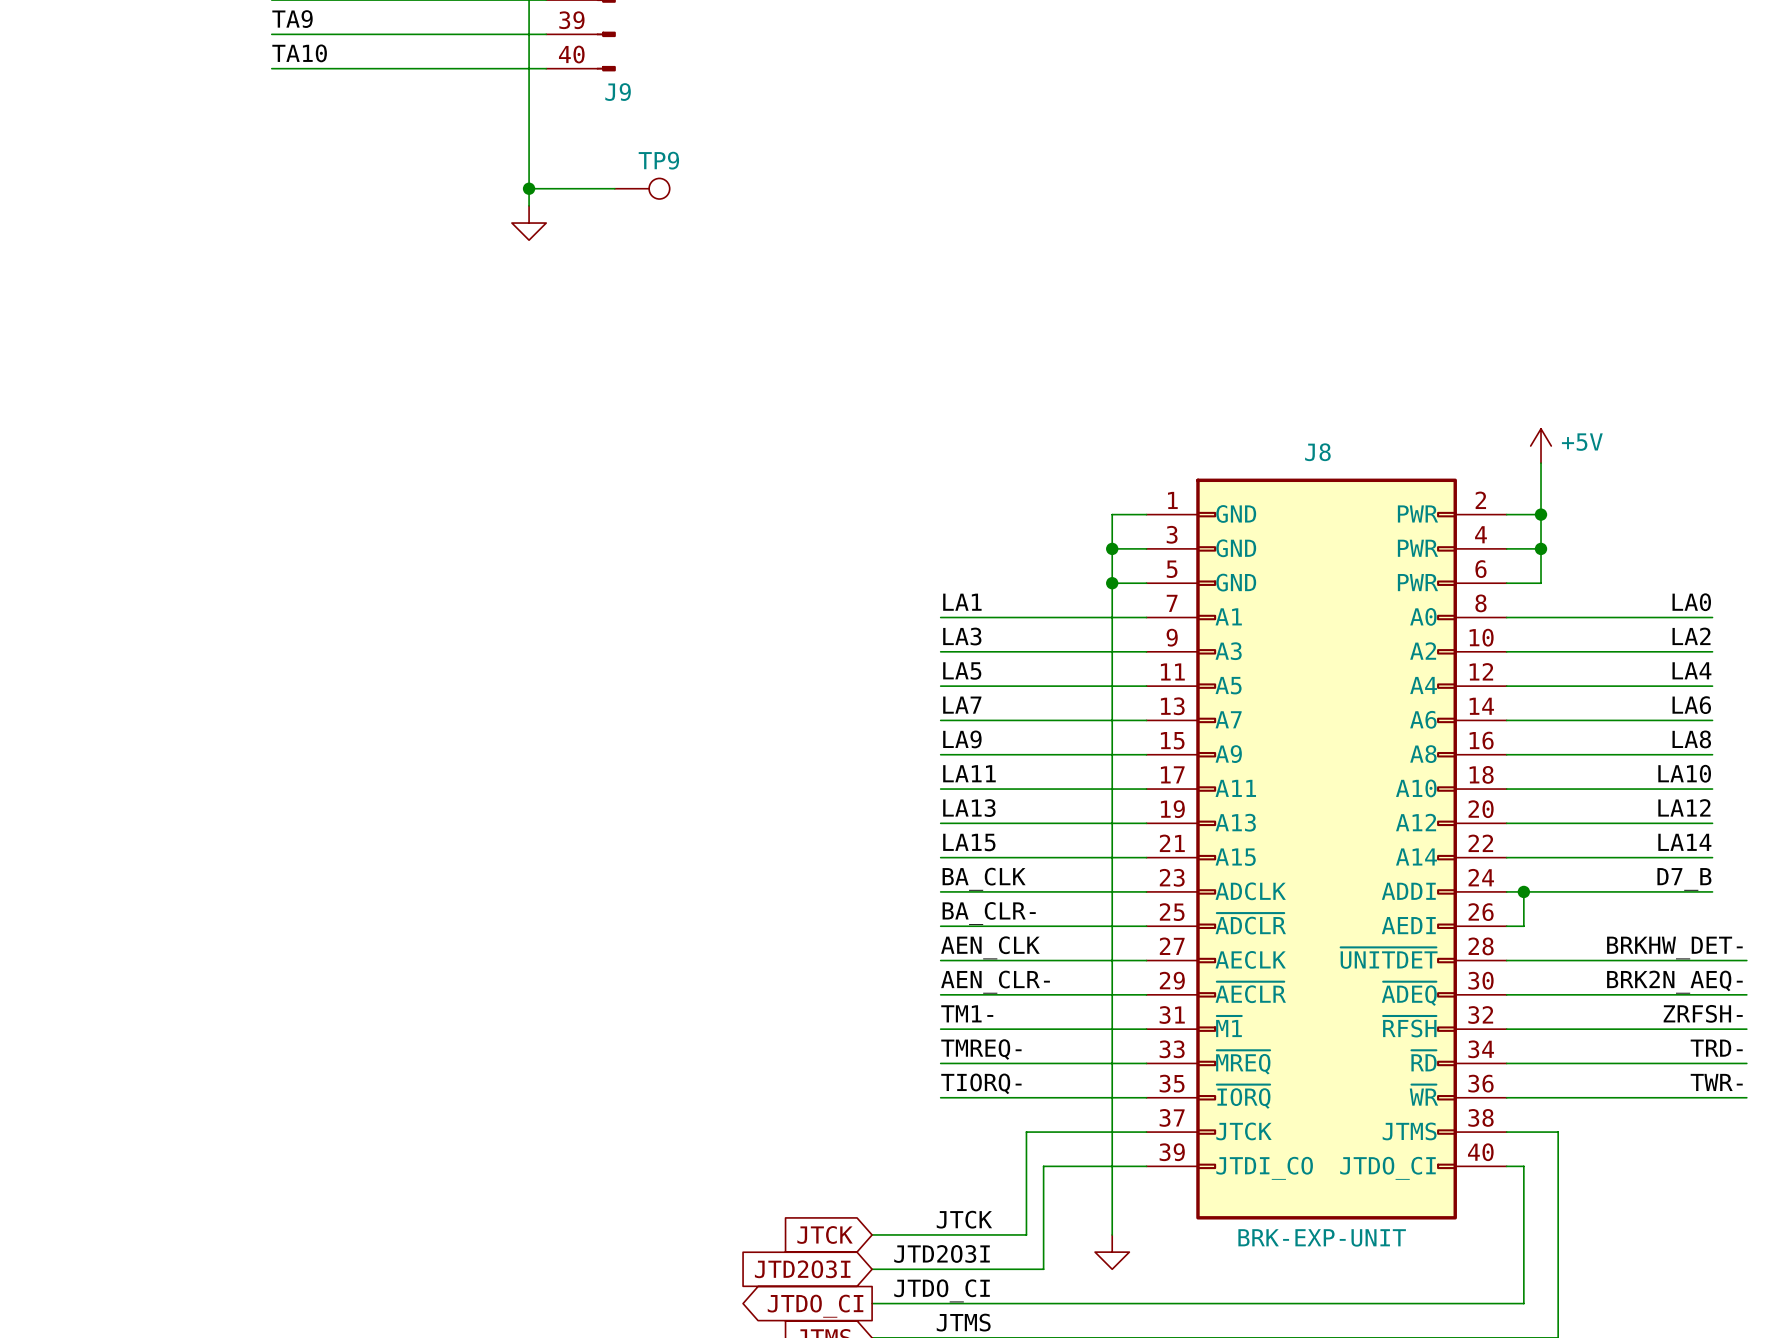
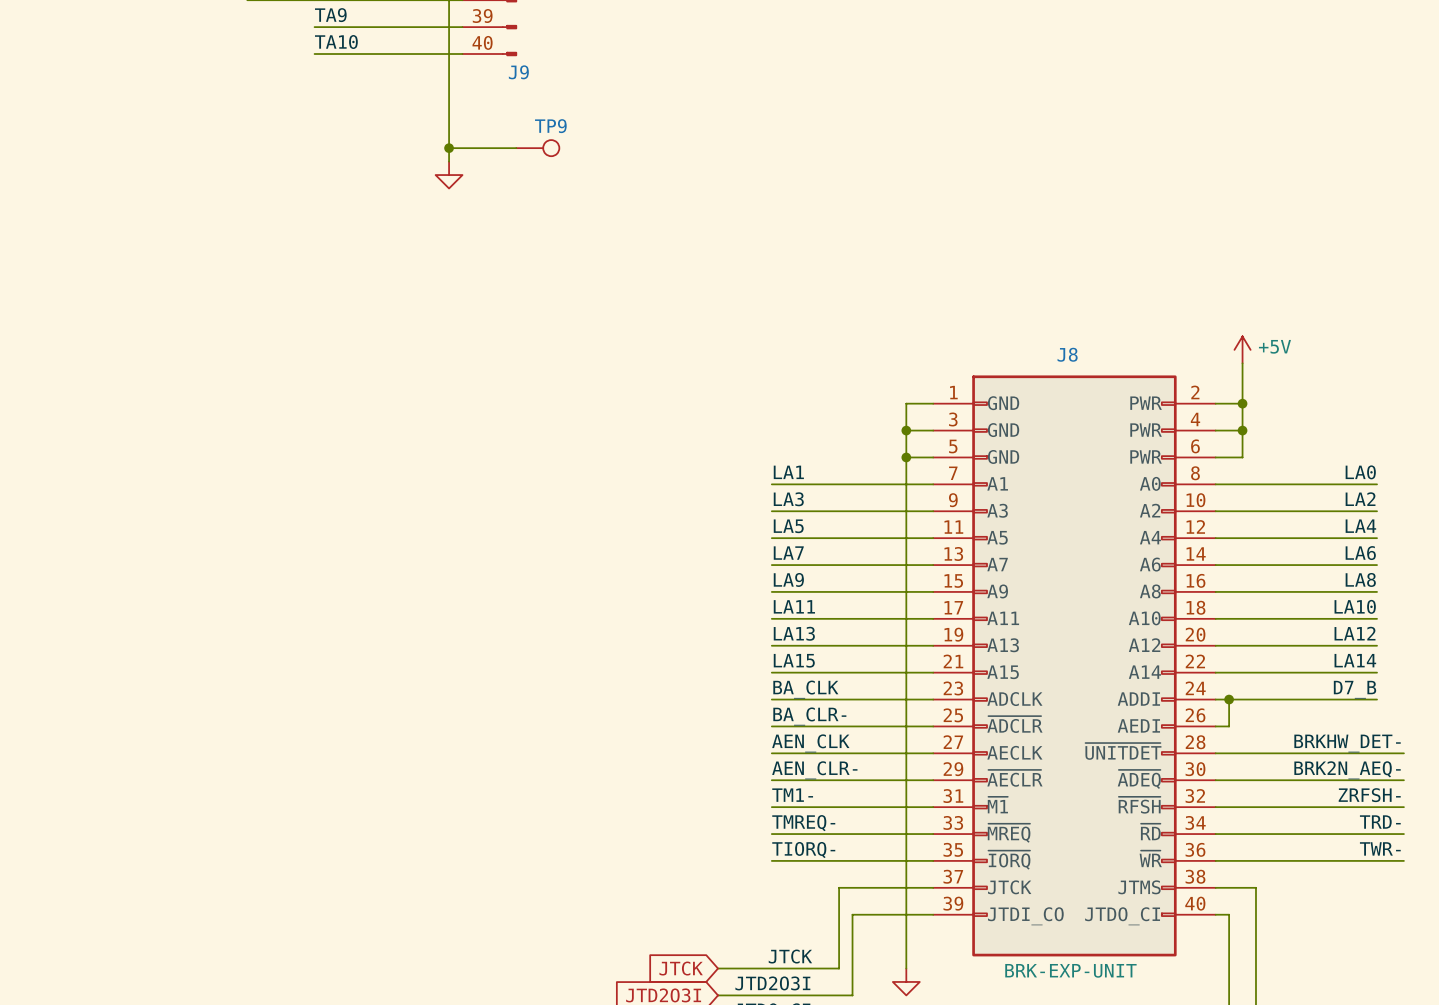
label position: TA9 (292, 19) -> TA9 (330, 15)
wire: (271, 34) (357, 34) -> none
label position: TA10 (299, 53) -> TA10 (336, 42)
wire: (271, 68) (357, 68) -> none

